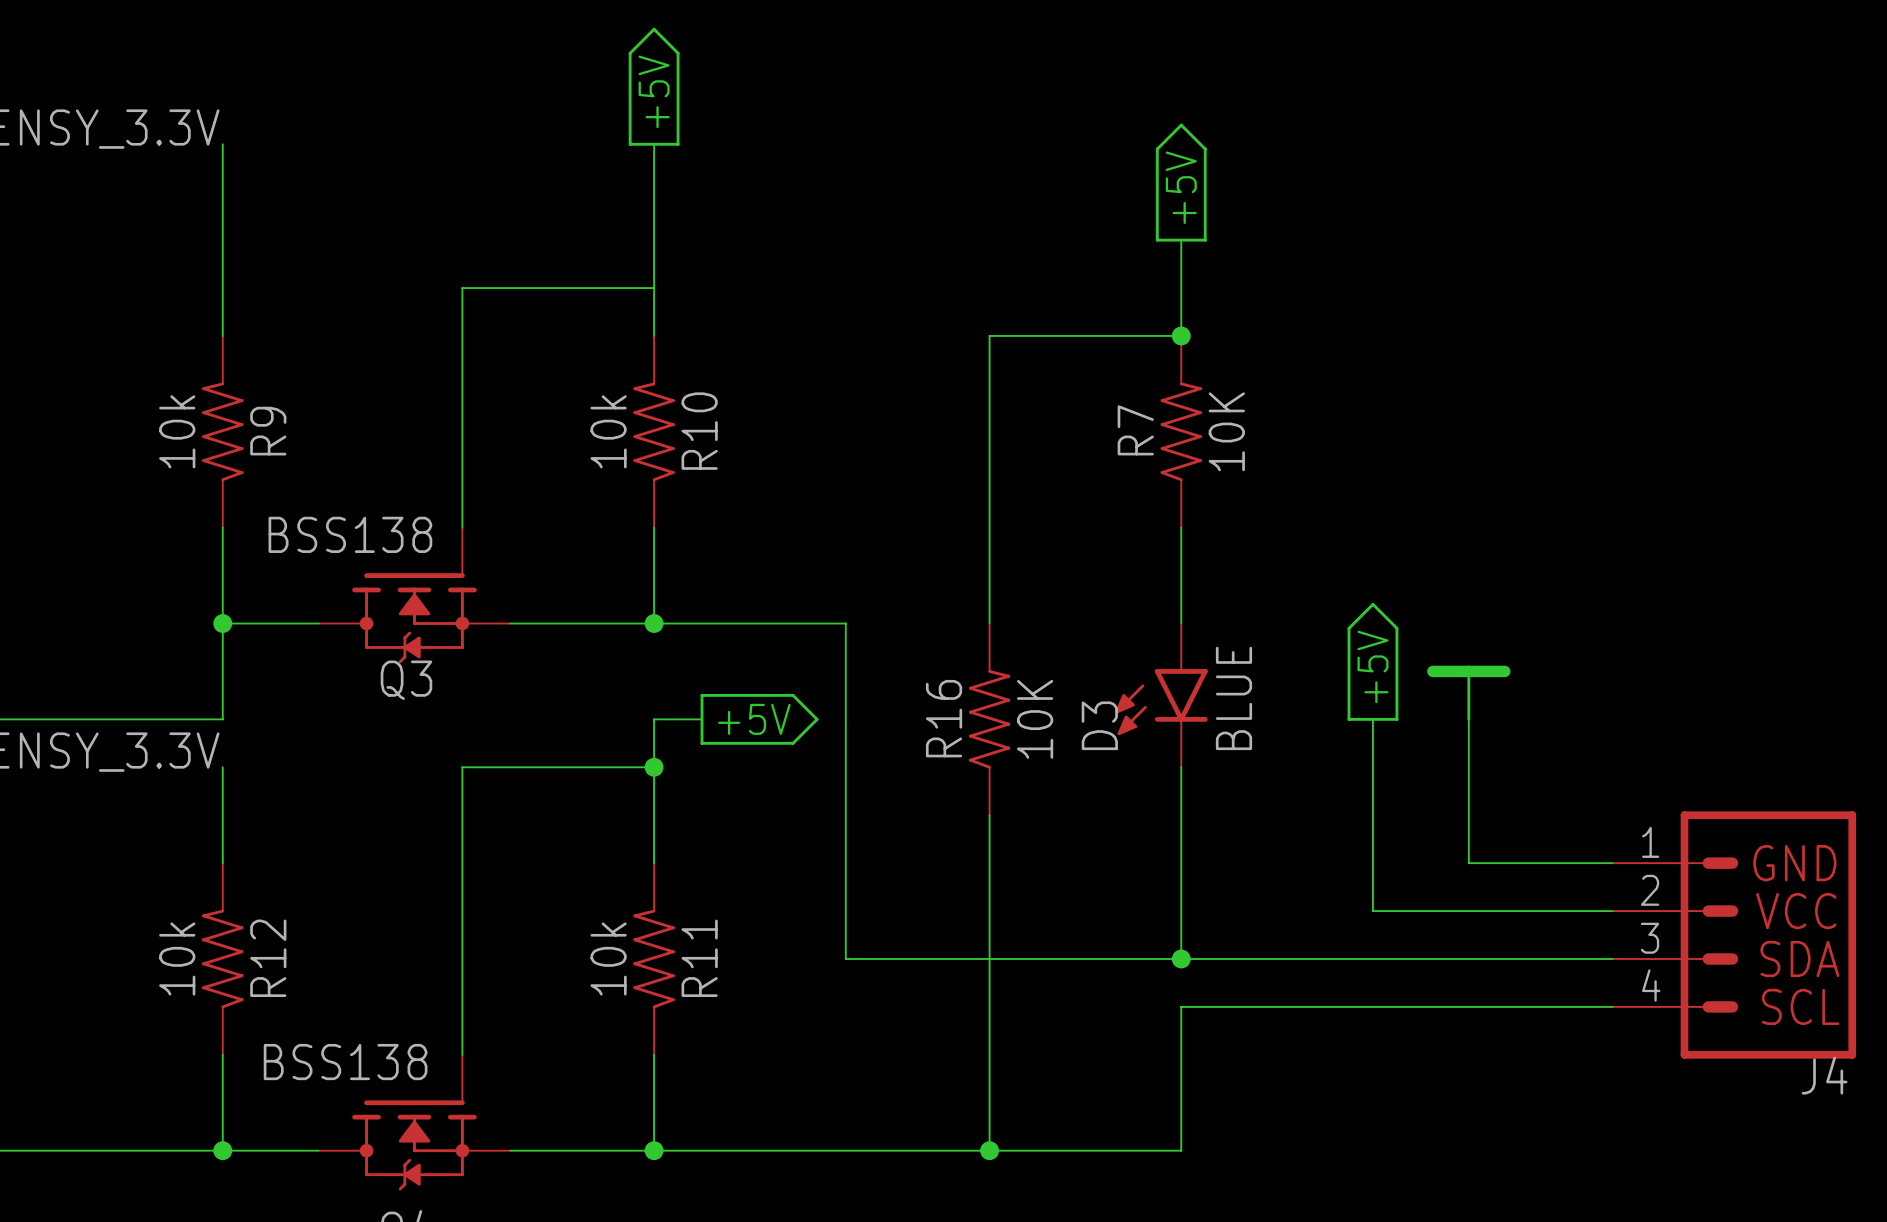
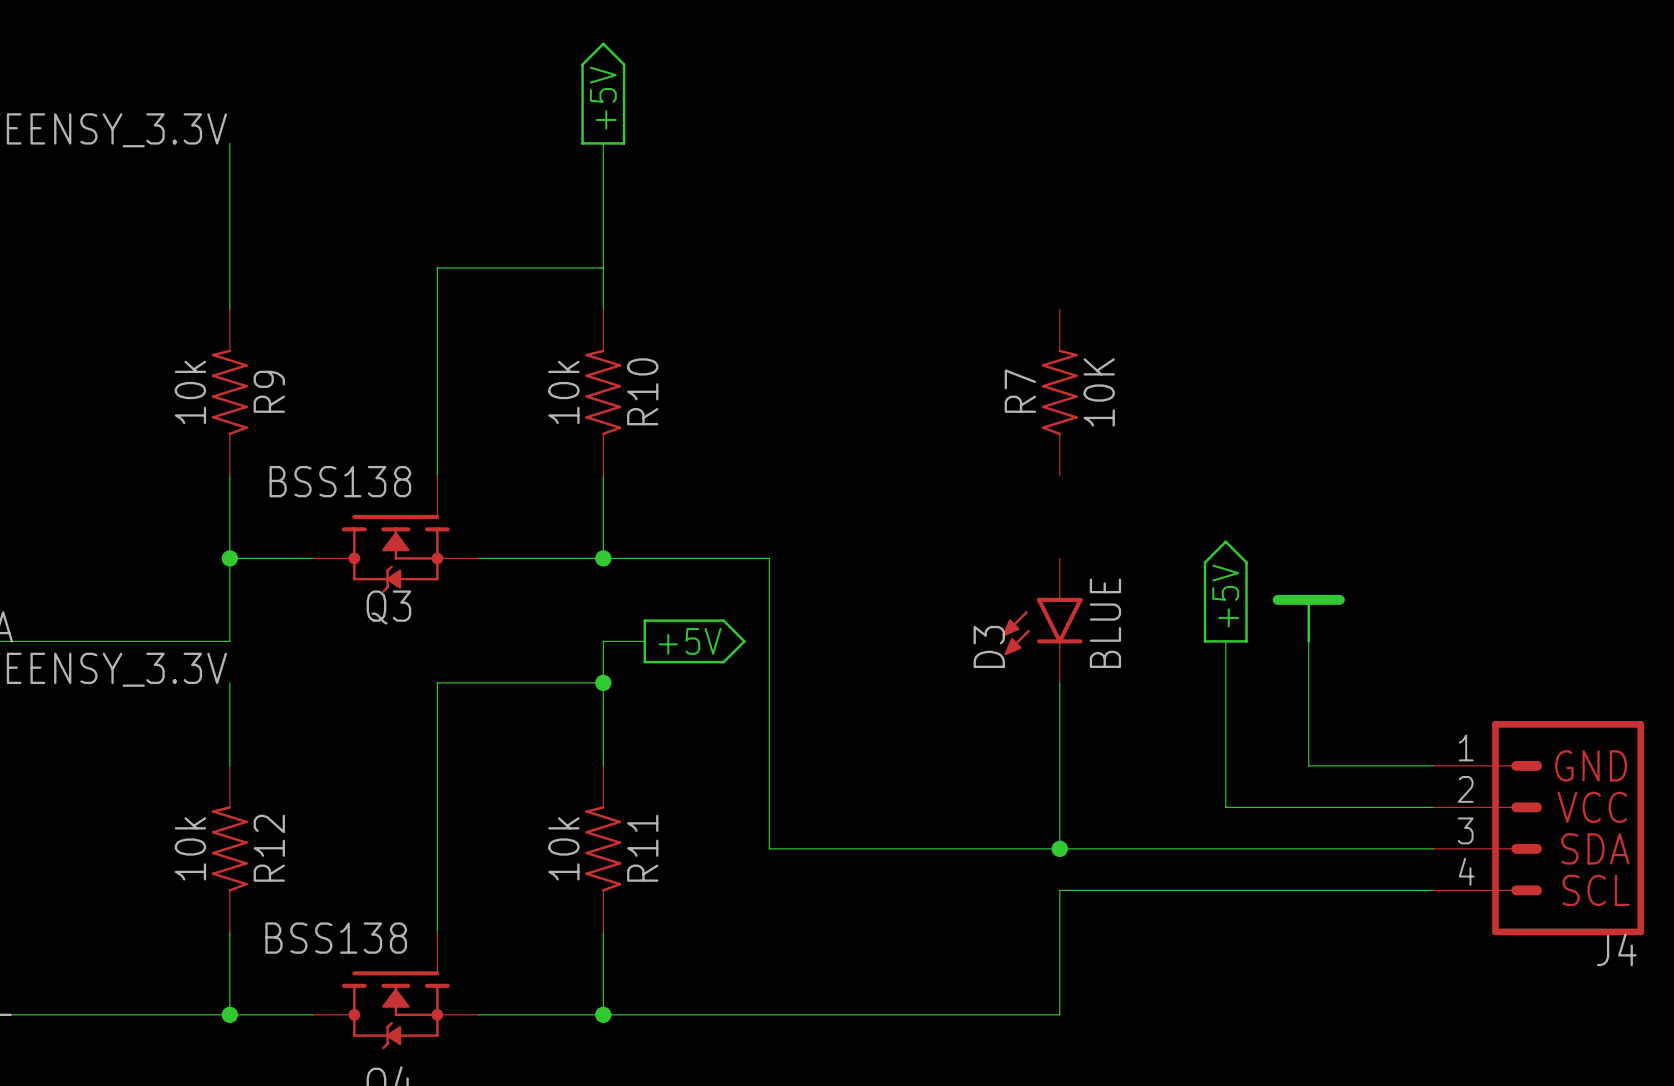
power symbol: (1181, 182) -> none
wire: (1181, 240) (1181, 335) (989, 335) (989, 623) -> none
junction: (1181, 335) -> none
wire: (1181, 527) (1181, 623) -> none
R16: 10K (989, 719) -> none
wire: (989, 815) (989, 1150) -> none
junction: (989, 1150) -> none

